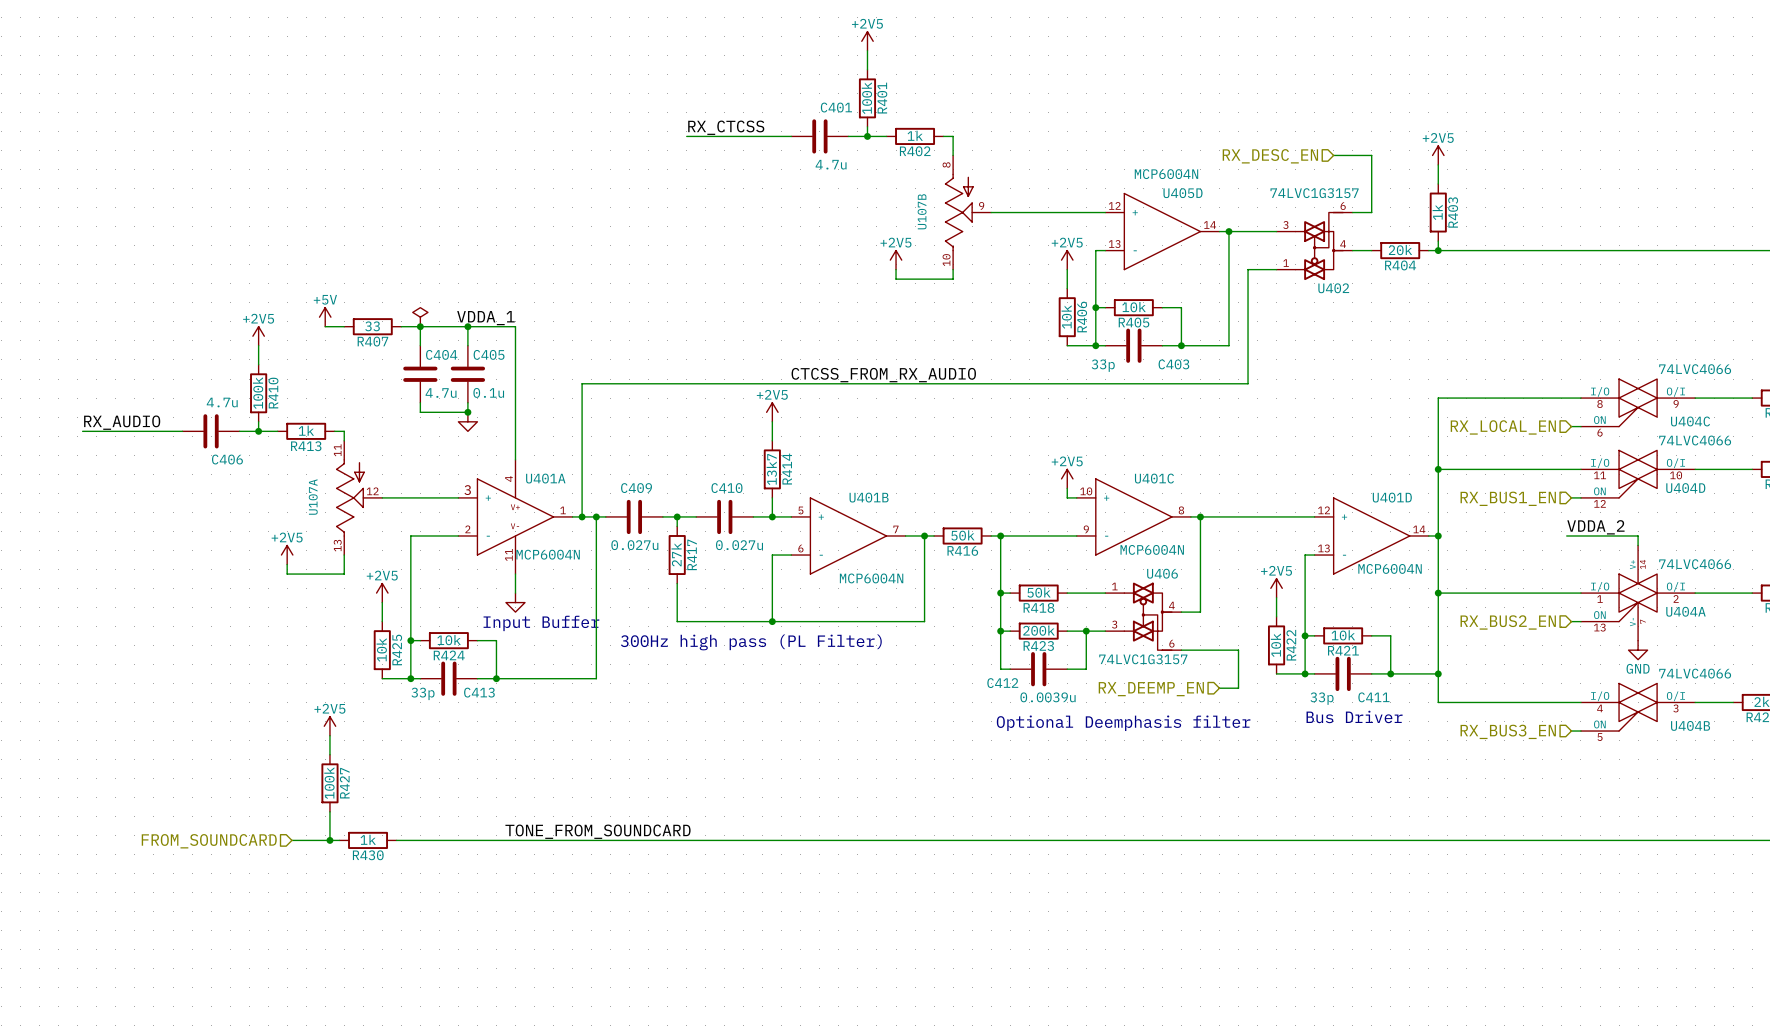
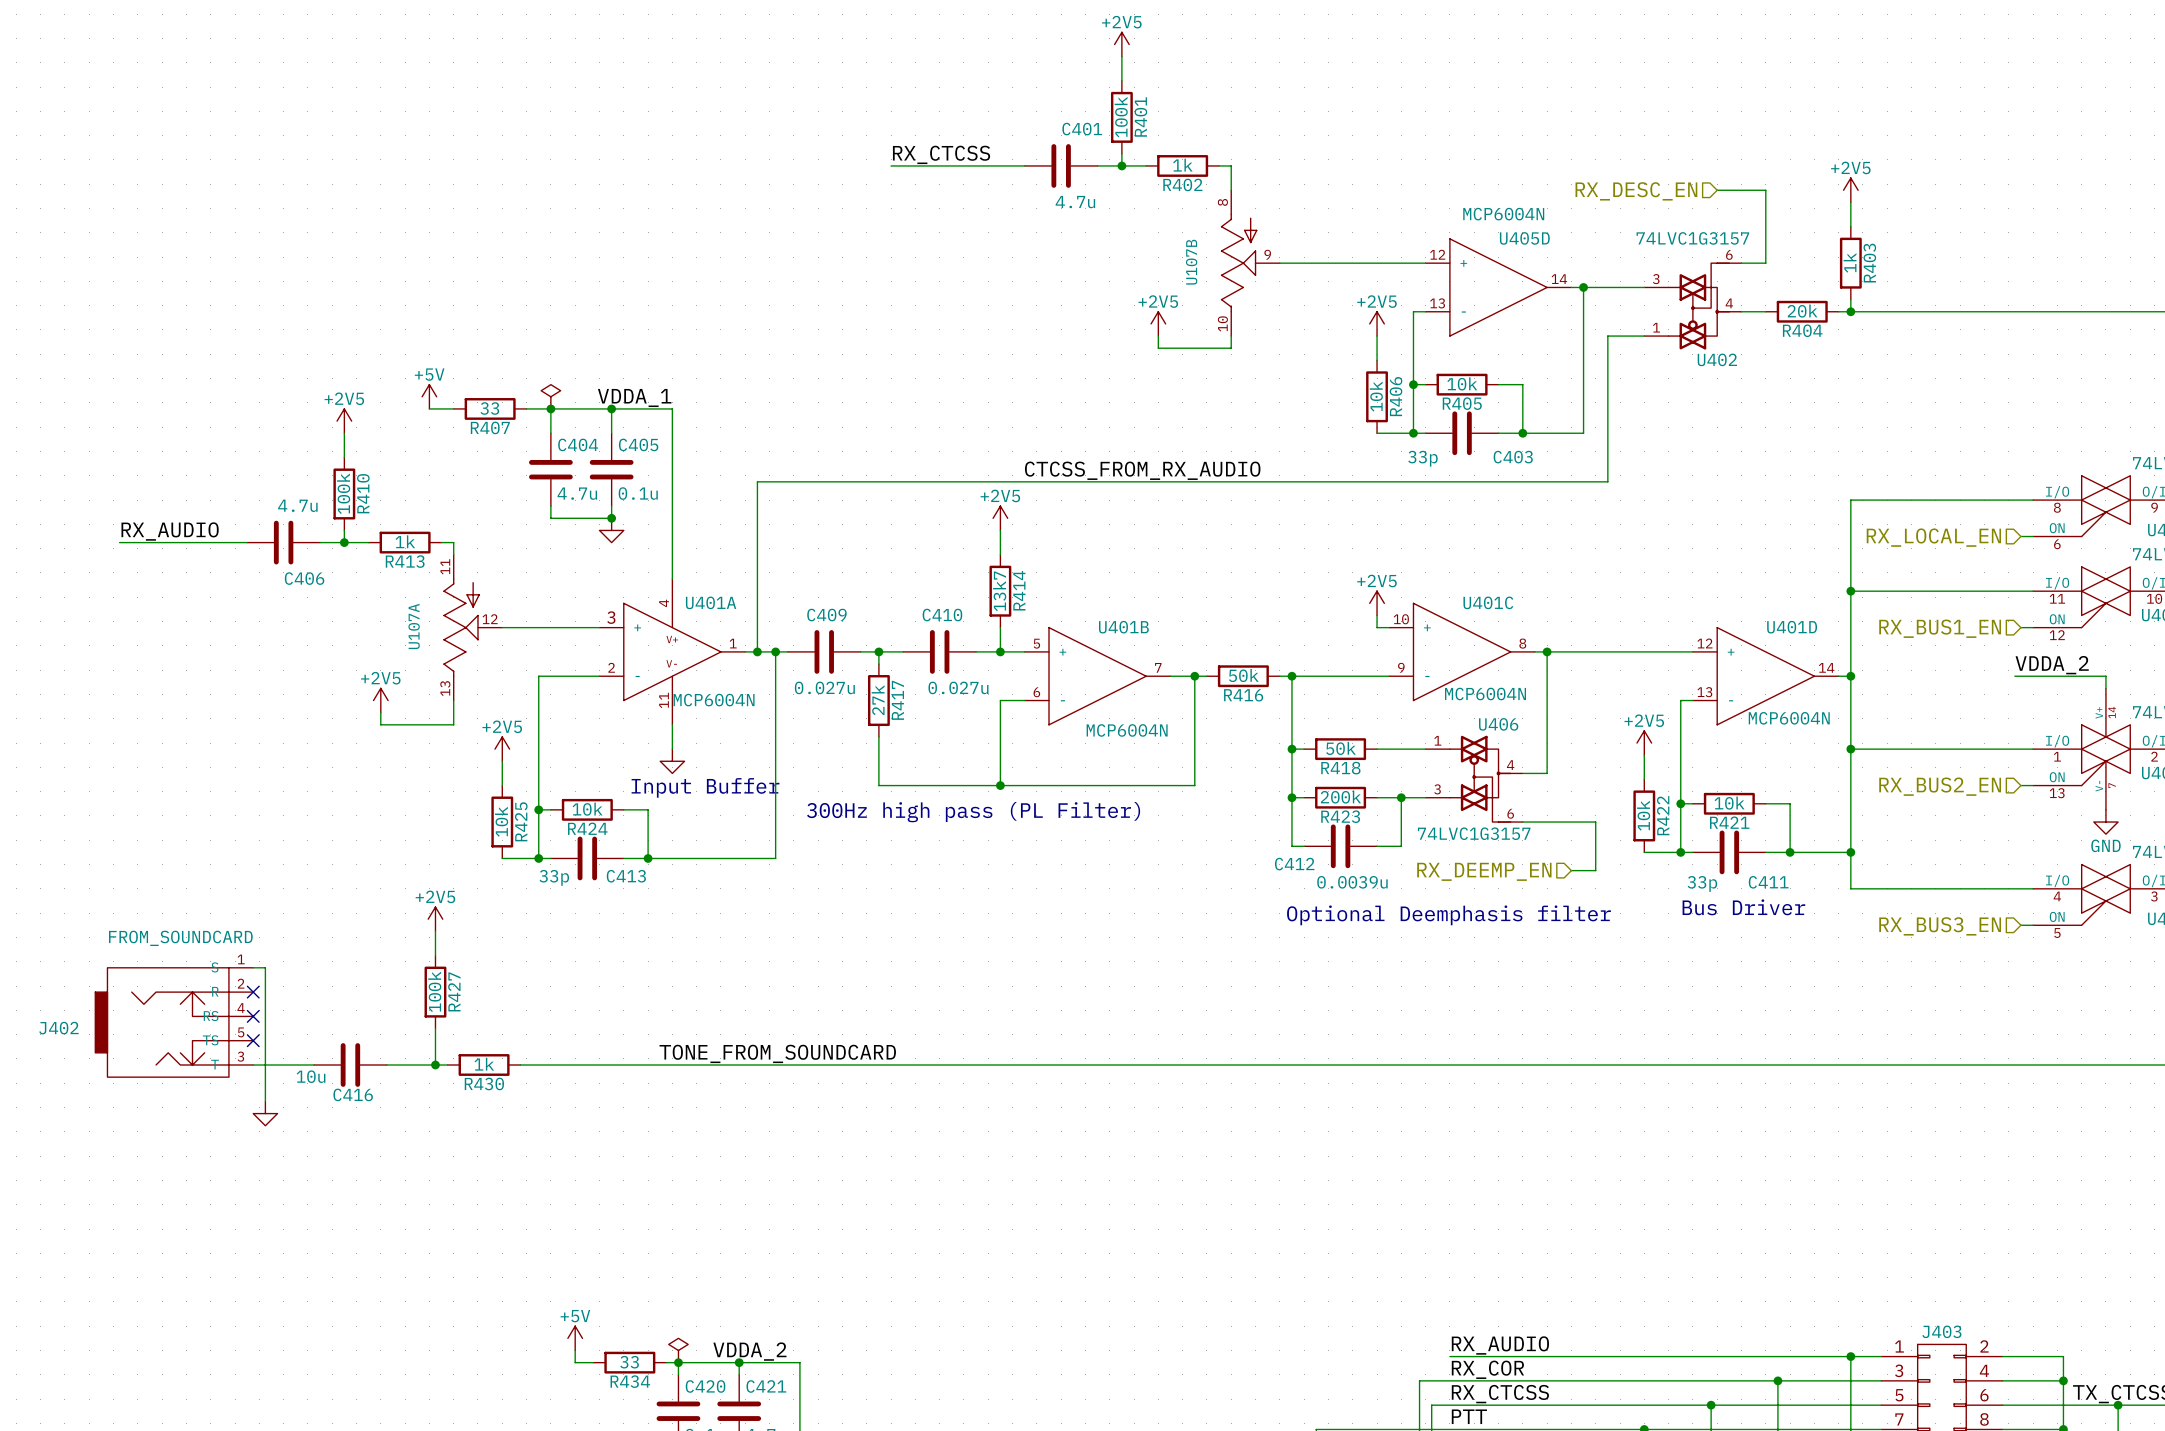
wire: none -> (253, 967) (265, 967) (265, 1101)
no-connect mark: none -> (253, 992)
no-connect mark: none -> (253, 1016)
J402: none -> FROM_SOUNDCARD (174, 1022)
no-connect mark: none -> (253, 1040)
wire: none -> (253, 1065) (313, 1065)
C416: none -> 10u (350, 1065)
hierarchical label: FROM_SOUNDCARD (209, 841) -> none
power symbol: none -> (265, 1113)

